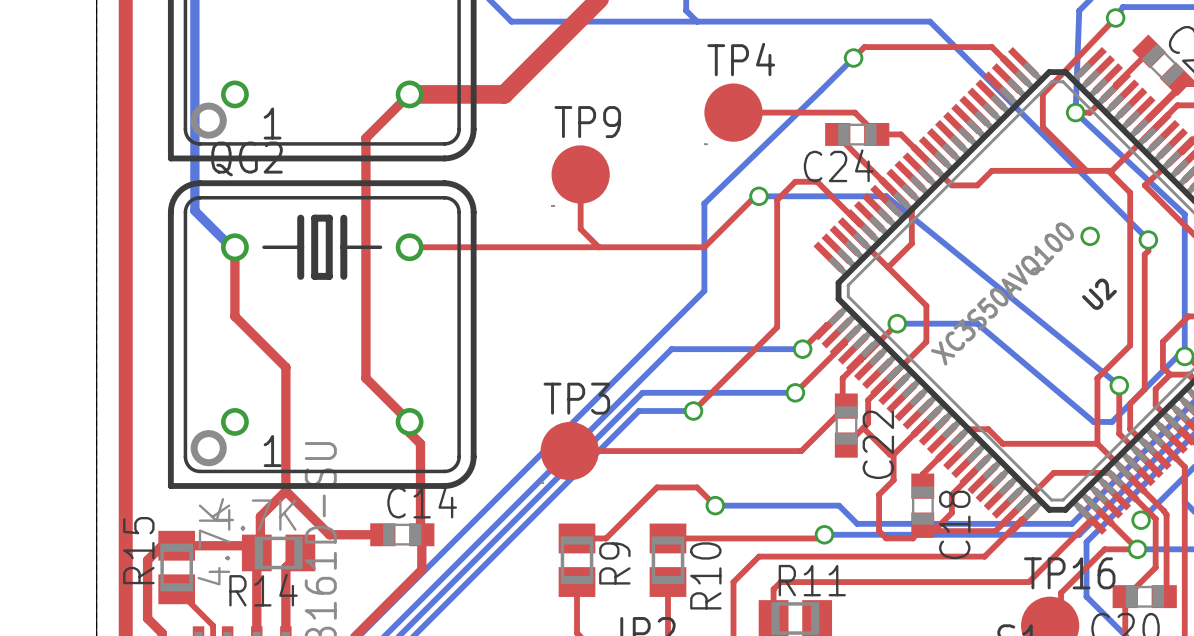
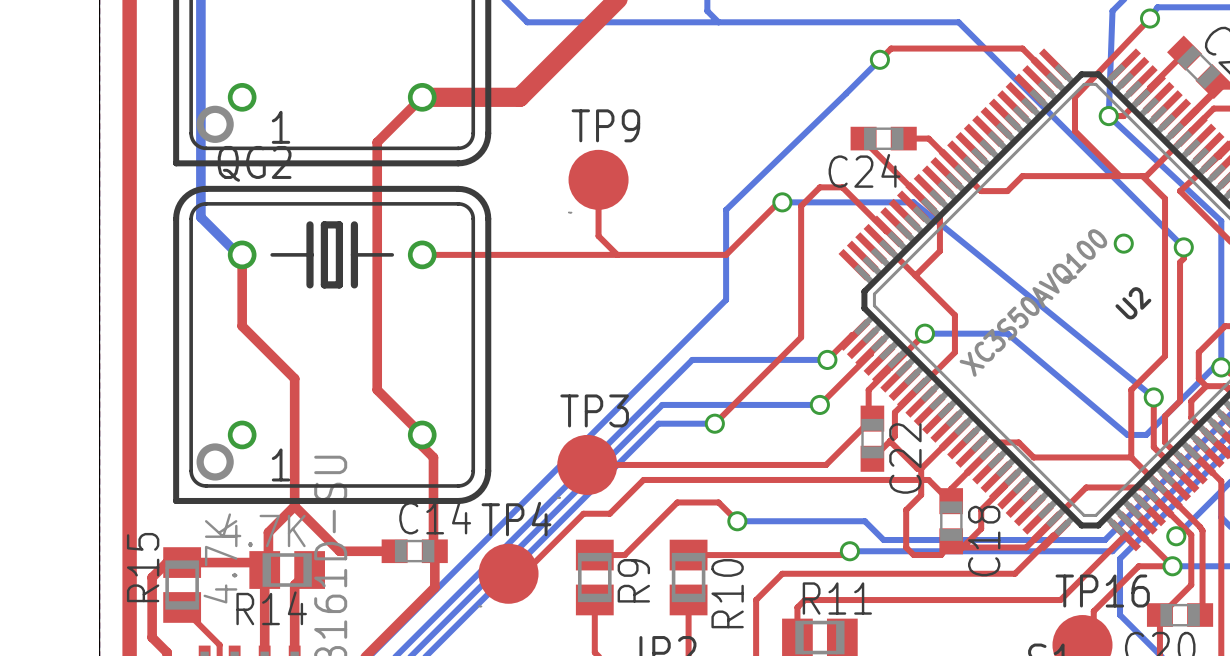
top track: (733, 112) (854, 112) (876, 134) -> none
TP4 position: (733, 112) -> (508, 573)
top track: none -> (951, 502) (928, 479) (643, 479) (609, 513) (583, 513) (523, 573) (508, 573)

